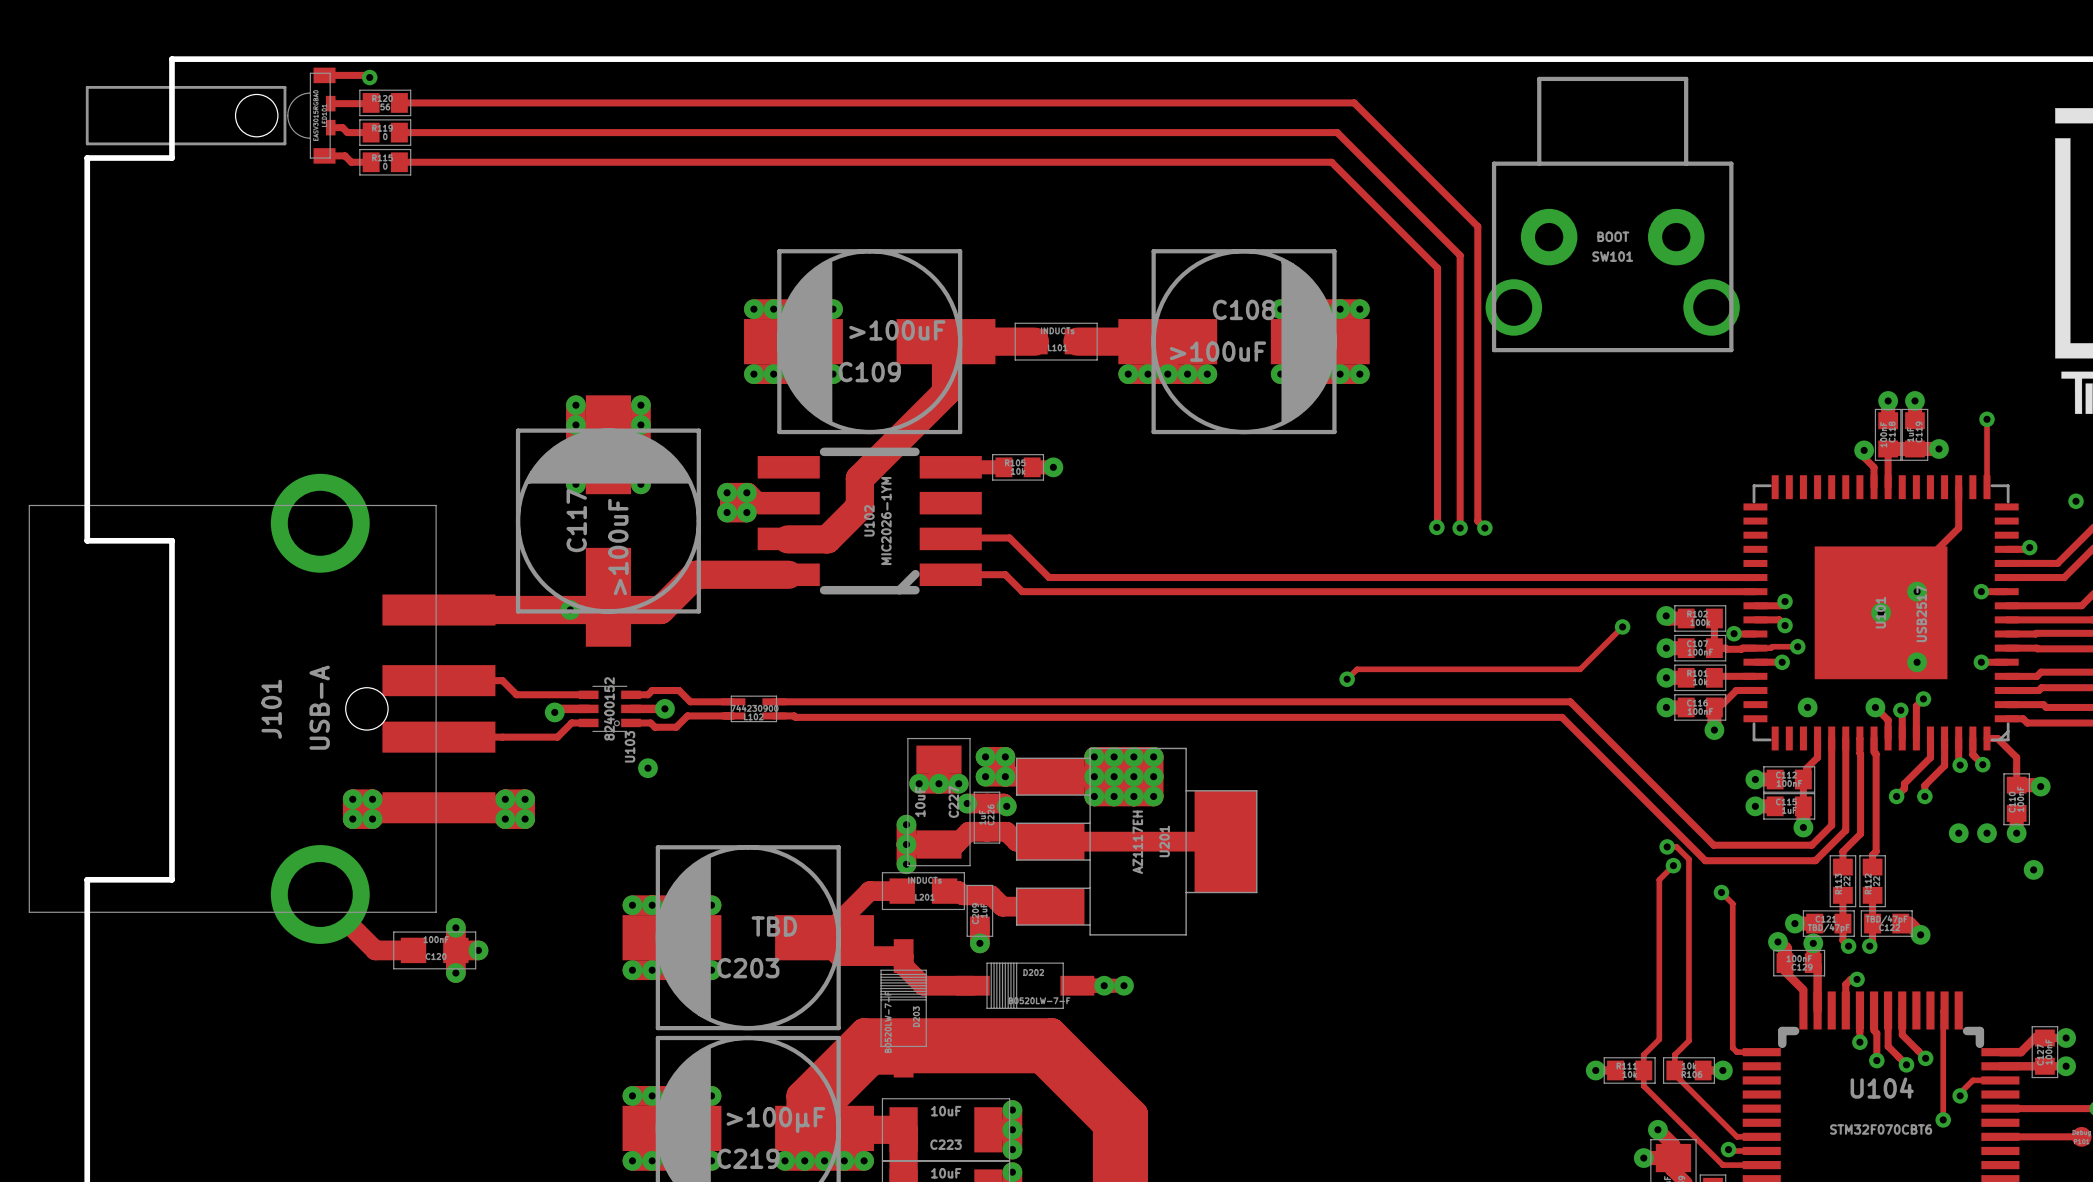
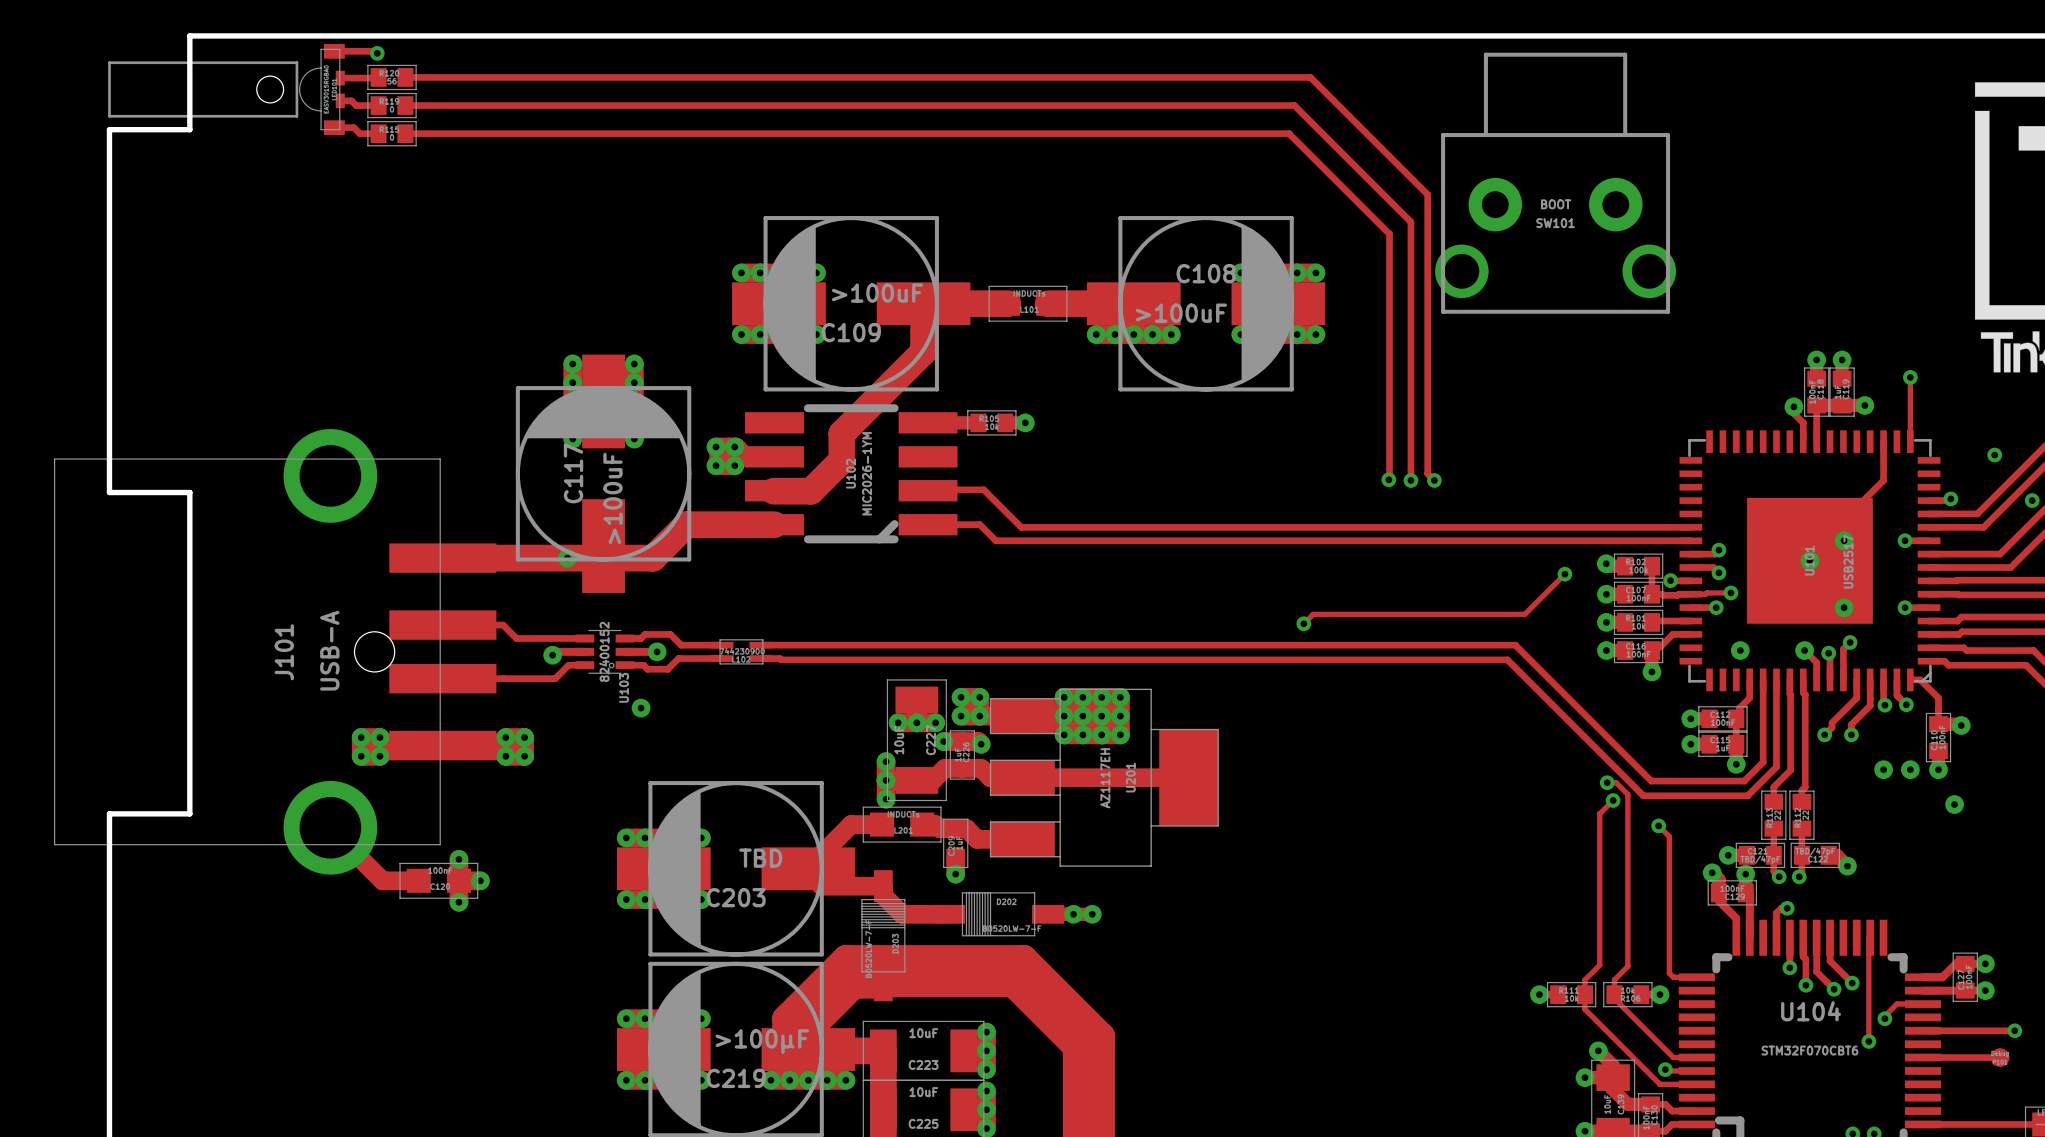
part footprint: [85, 67, 336, 164] -> [108, 43, 345, 136]

